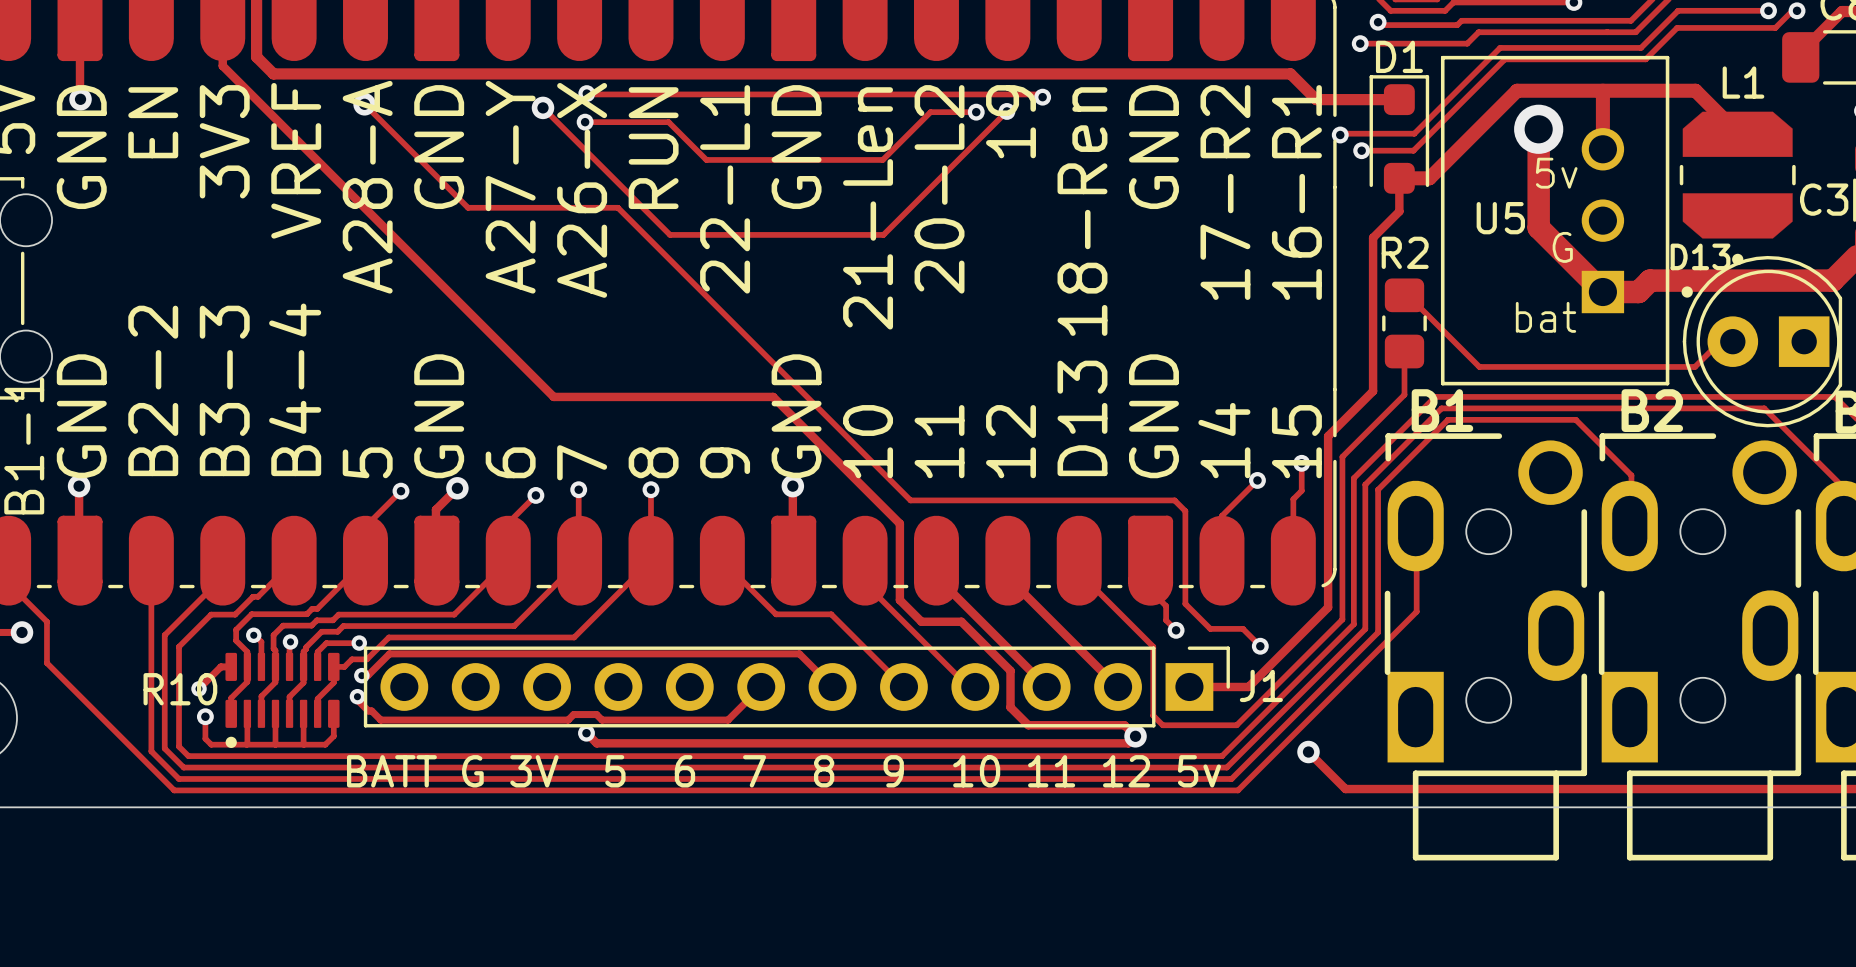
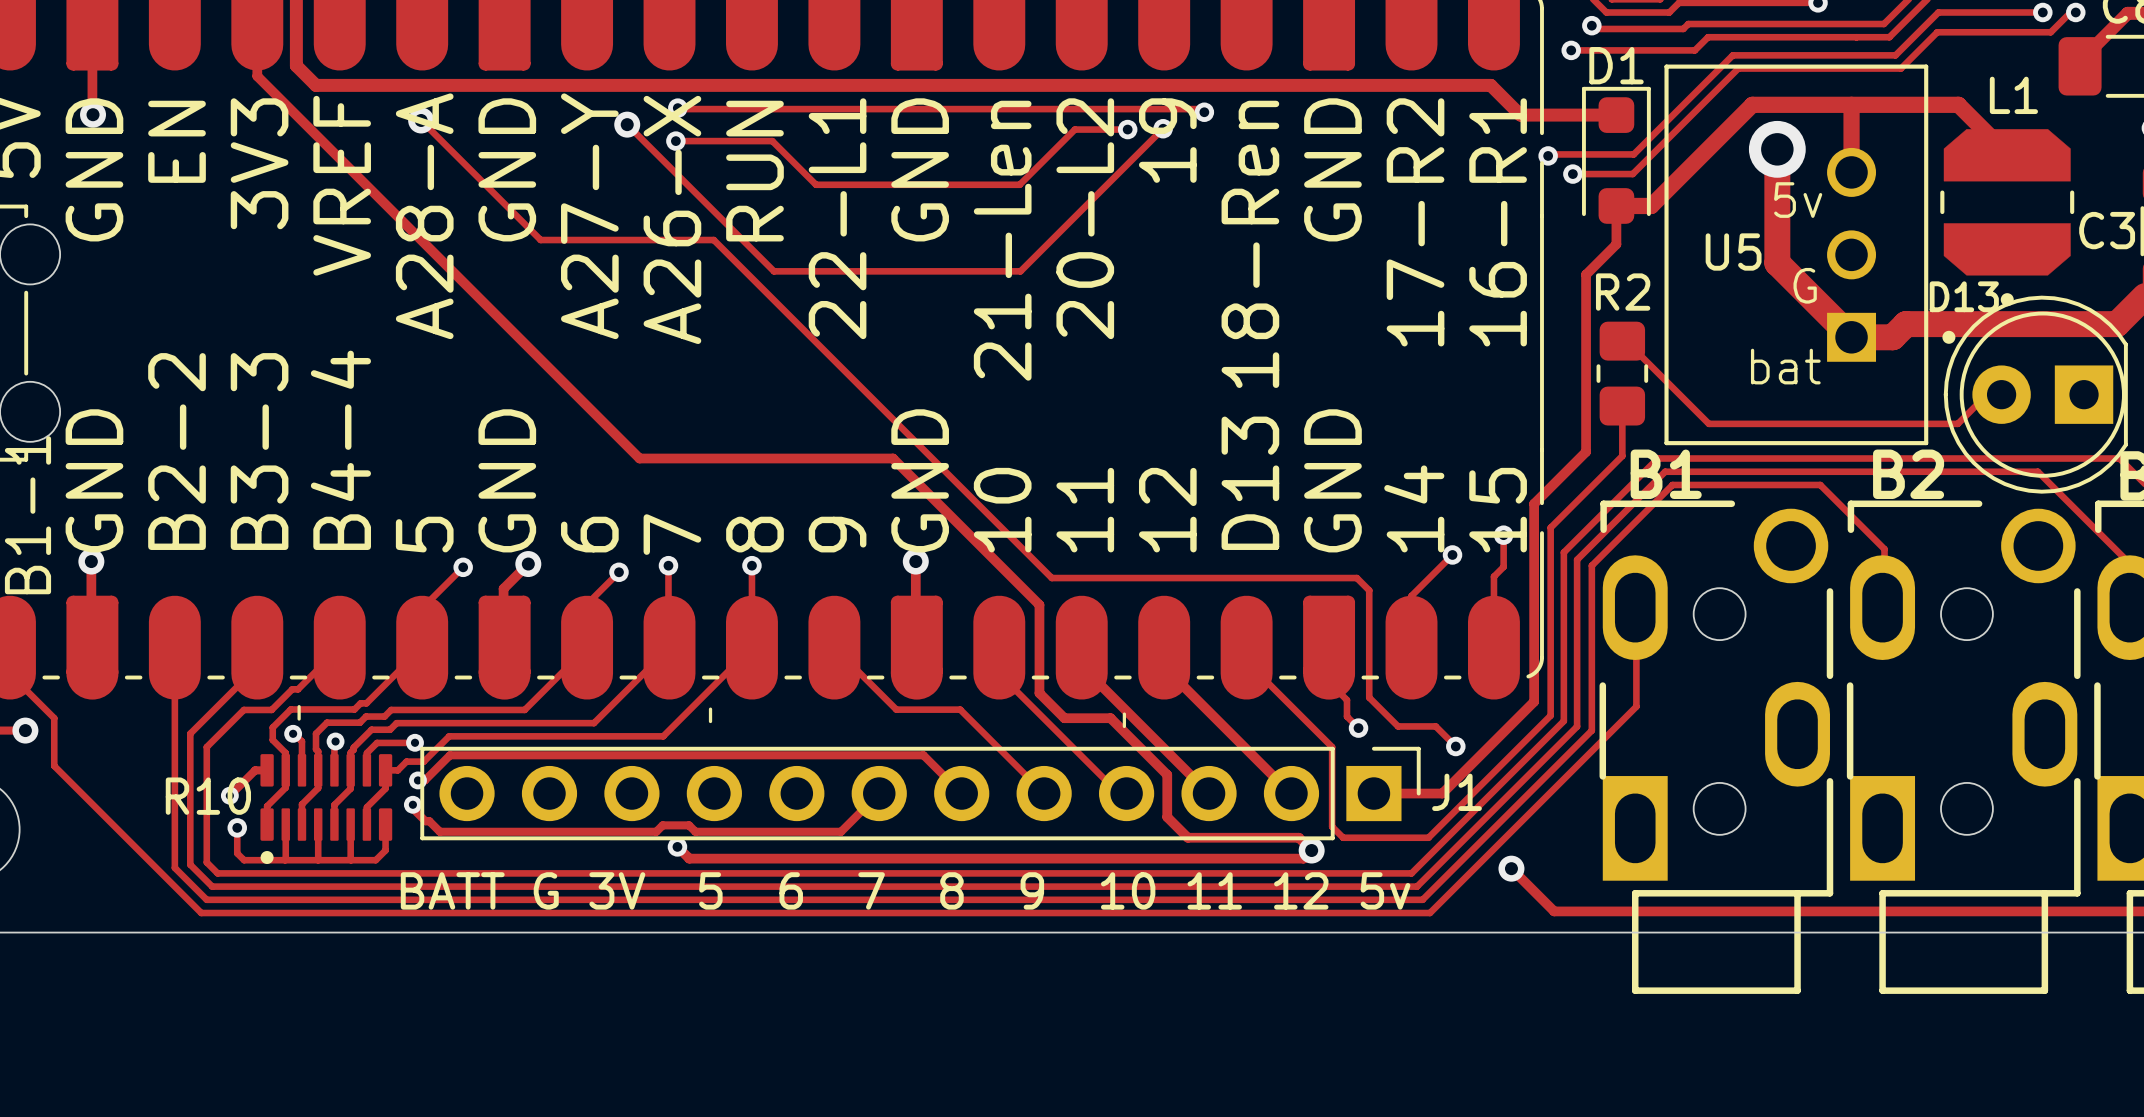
line: none -> (299, 706) (299, 719)
line: none -> (710, 709) (710, 721)
line: none -> (1124, 714) (1124, 726)

